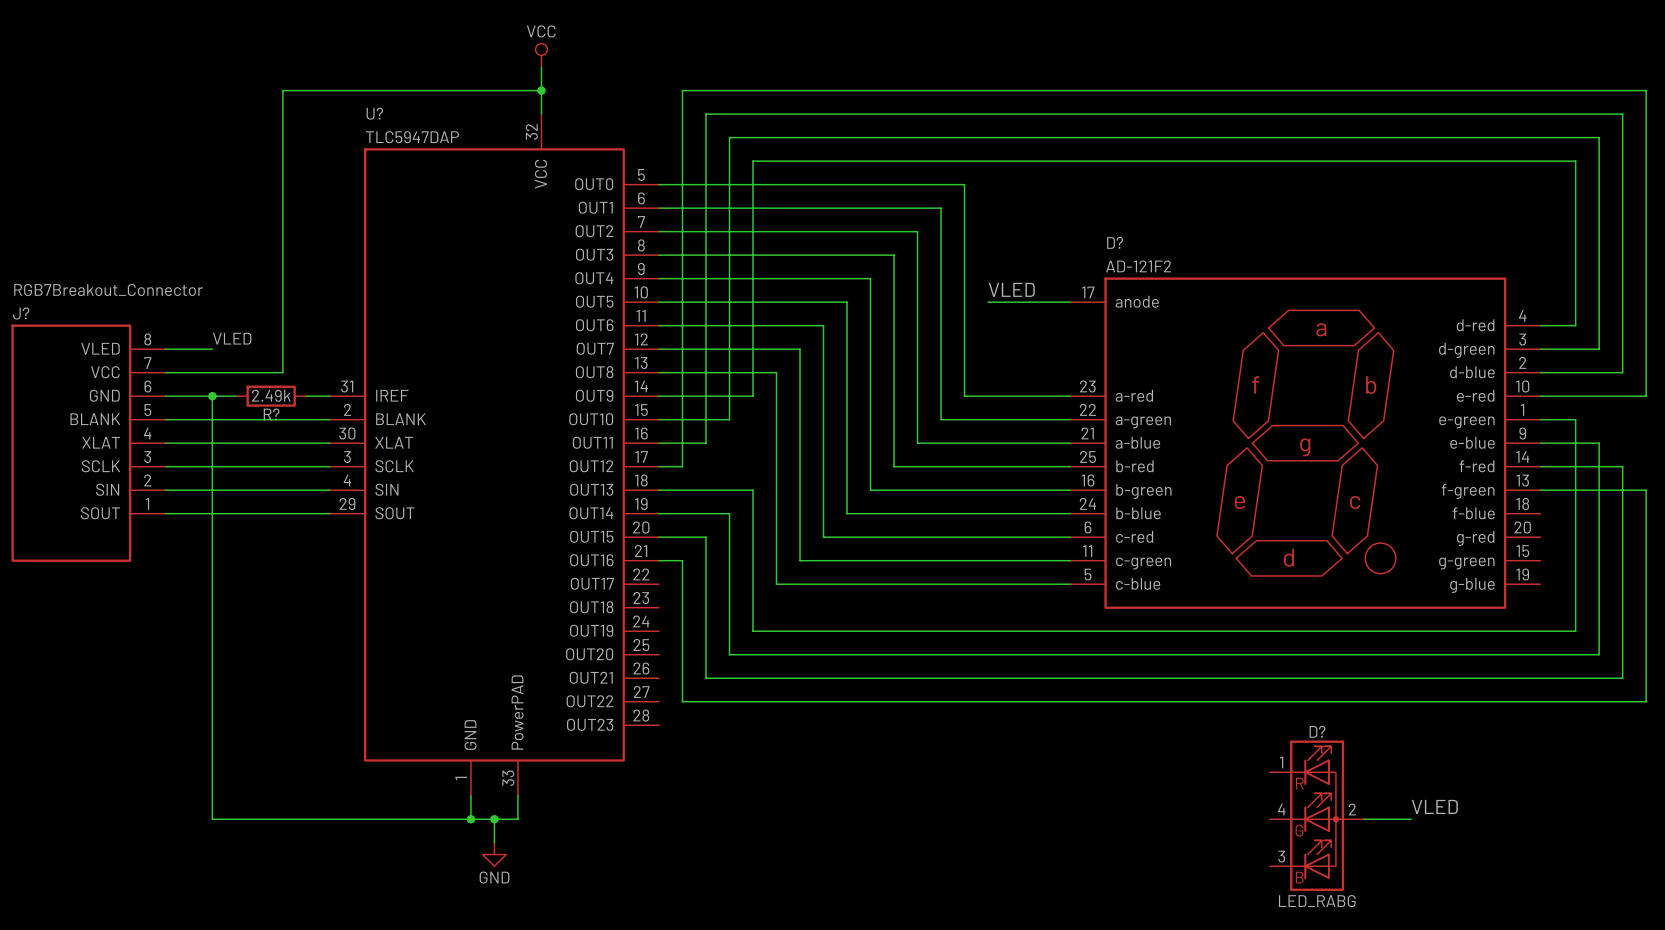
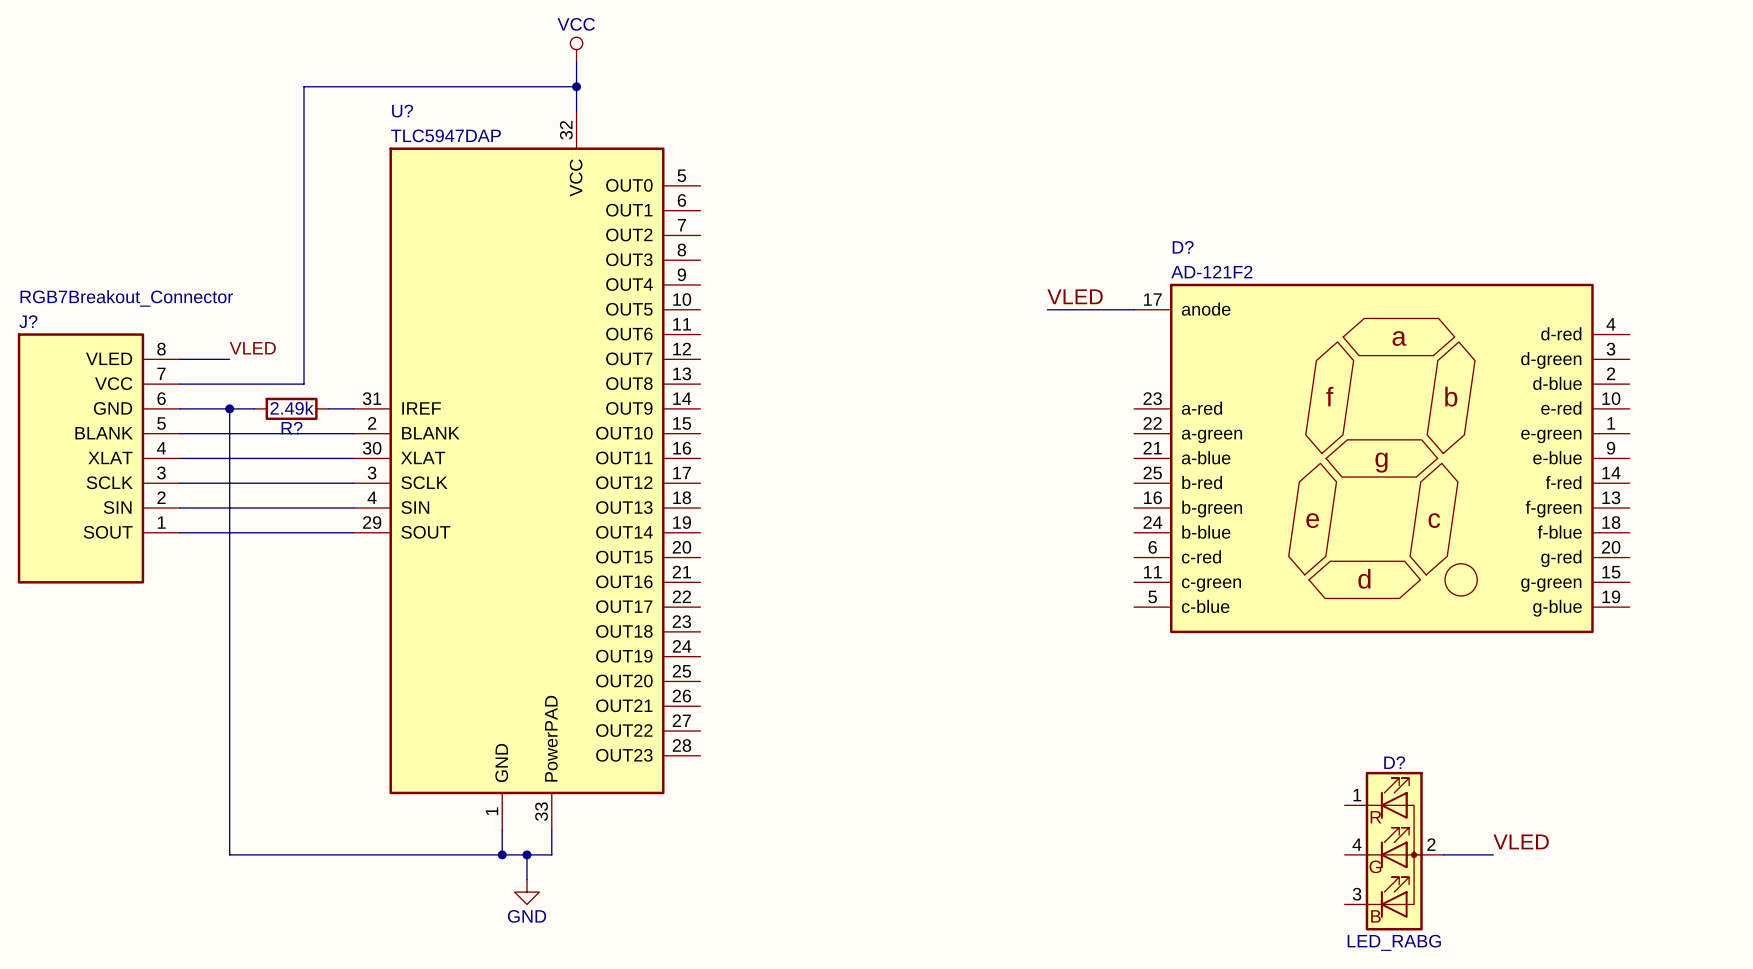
wire: (658, 184) (964, 184) (964, 396) (1070, 396) -> none
wire: (658, 208) (941, 208) (941, 419) (1070, 419) -> none
wire: (658, 231) (917, 231) (917, 443) (1070, 443) -> none
wire: (658, 255) (894, 255) (894, 466) (1070, 466) -> none
wire: (658, 278) (870, 278) (870, 490) (1070, 490) -> none
wire: (658, 302) (847, 302) (847, 513) (1070, 513) -> none
wire: (658, 325) (823, 325) (823, 537) (1070, 537) -> none
wire: (1540, 325) (1575, 325) (1575, 161) (753, 161) (753, 396) (658, 396) -> none
wire: (658, 349) (800, 349) (800, 560) (1070, 560) -> none
wire: (1540, 349) (1599, 349) (1599, 137) (729, 137) (729, 419) (658, 419) -> none
wire: (658, 372) (776, 372) (776, 584) (1070, 584) -> none
wire: (1540, 372) (1622, 372) (1622, 114) (705, 114) (705, 443) (658, 443) -> none
wire: (1540, 396) (1646, 396) (1646, 90) (682, 90) (682, 466) (658, 466) -> none
wire: (1540, 419) (1575, 419) (1575, 631) (753, 631) (753, 490) (658, 490) -> none
wire: (1540, 443) (1599, 443) (1599, 654) (729, 654) (729, 513) (658, 513) -> none
wire: (1540, 466) (1622, 466) (1622, 678) (705, 678) (705, 537) (658, 537) -> none
wire: (1540, 490) (1646, 490) (1646, 701) (682, 701) (682, 560) (658, 560) -> none

